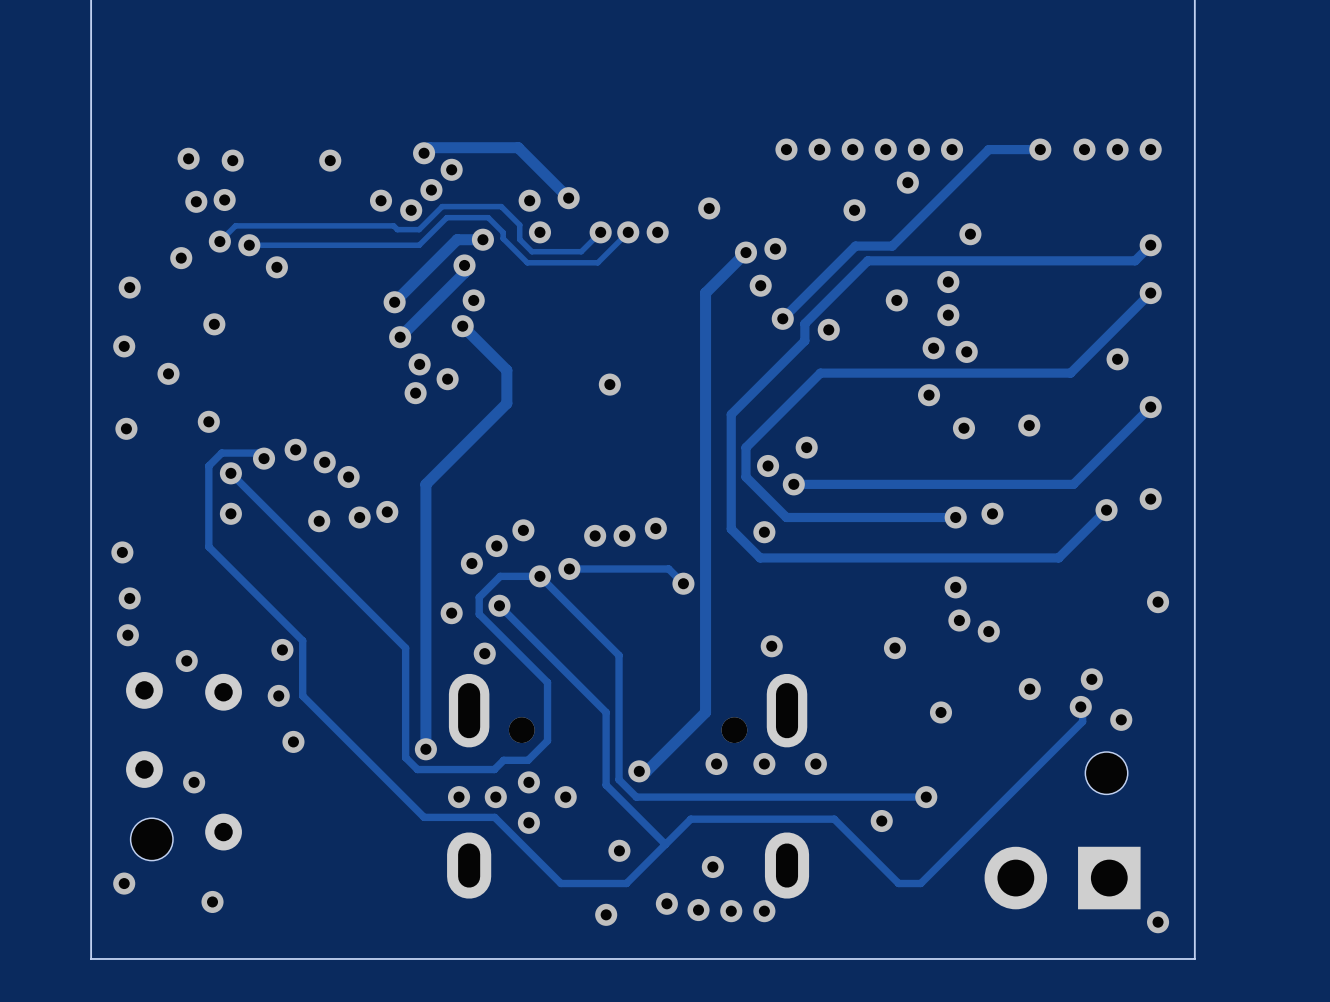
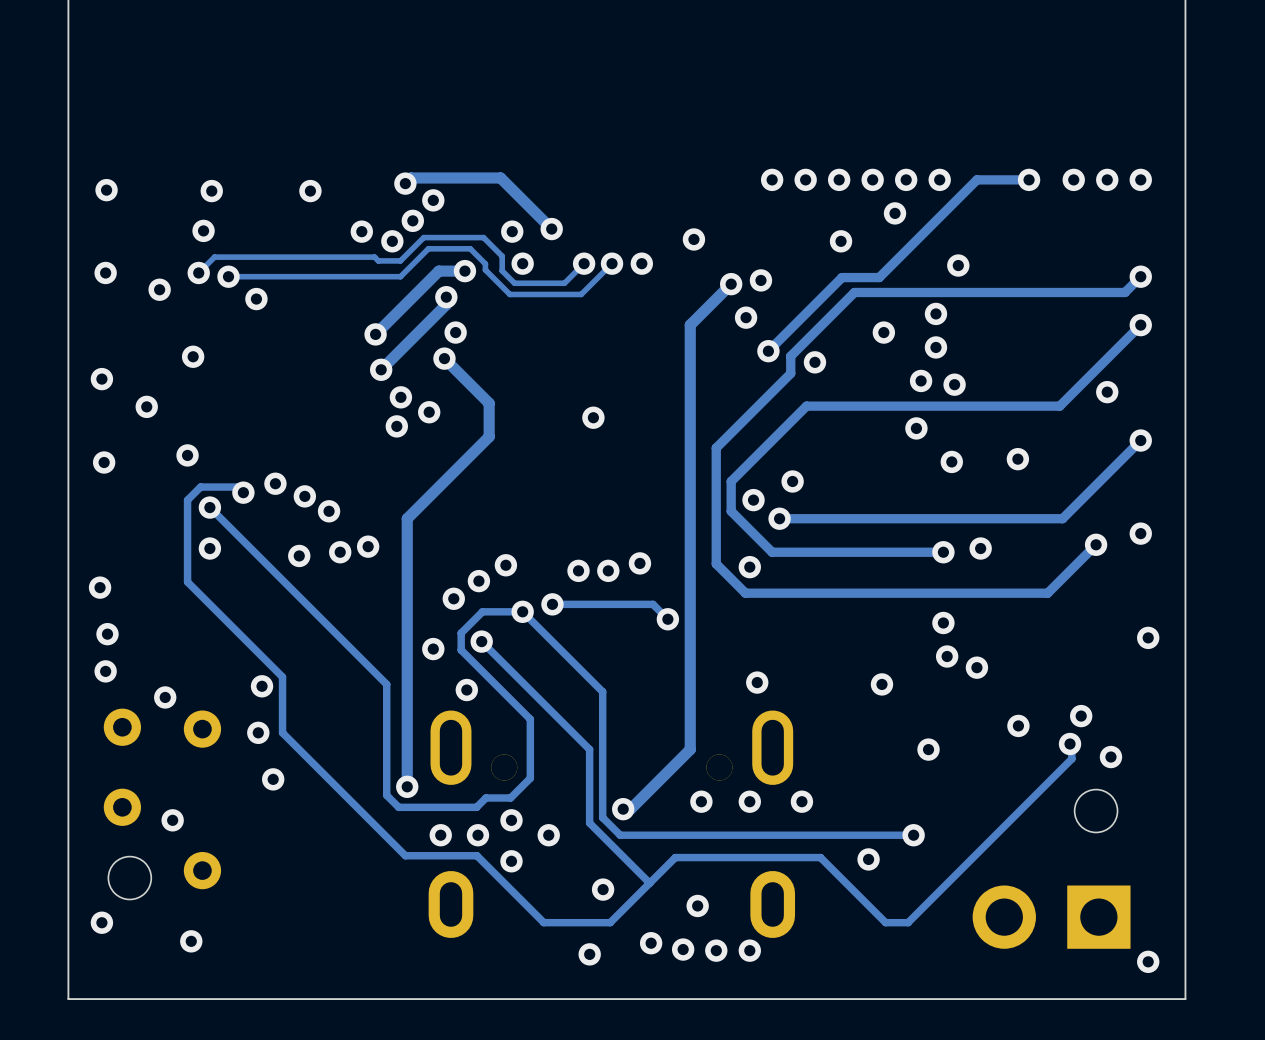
via: (188, 158) -> none
via: none -> (106, 190)
via: (196, 201) -> none
via: none -> (105, 272)
via: (129, 287) -> none

